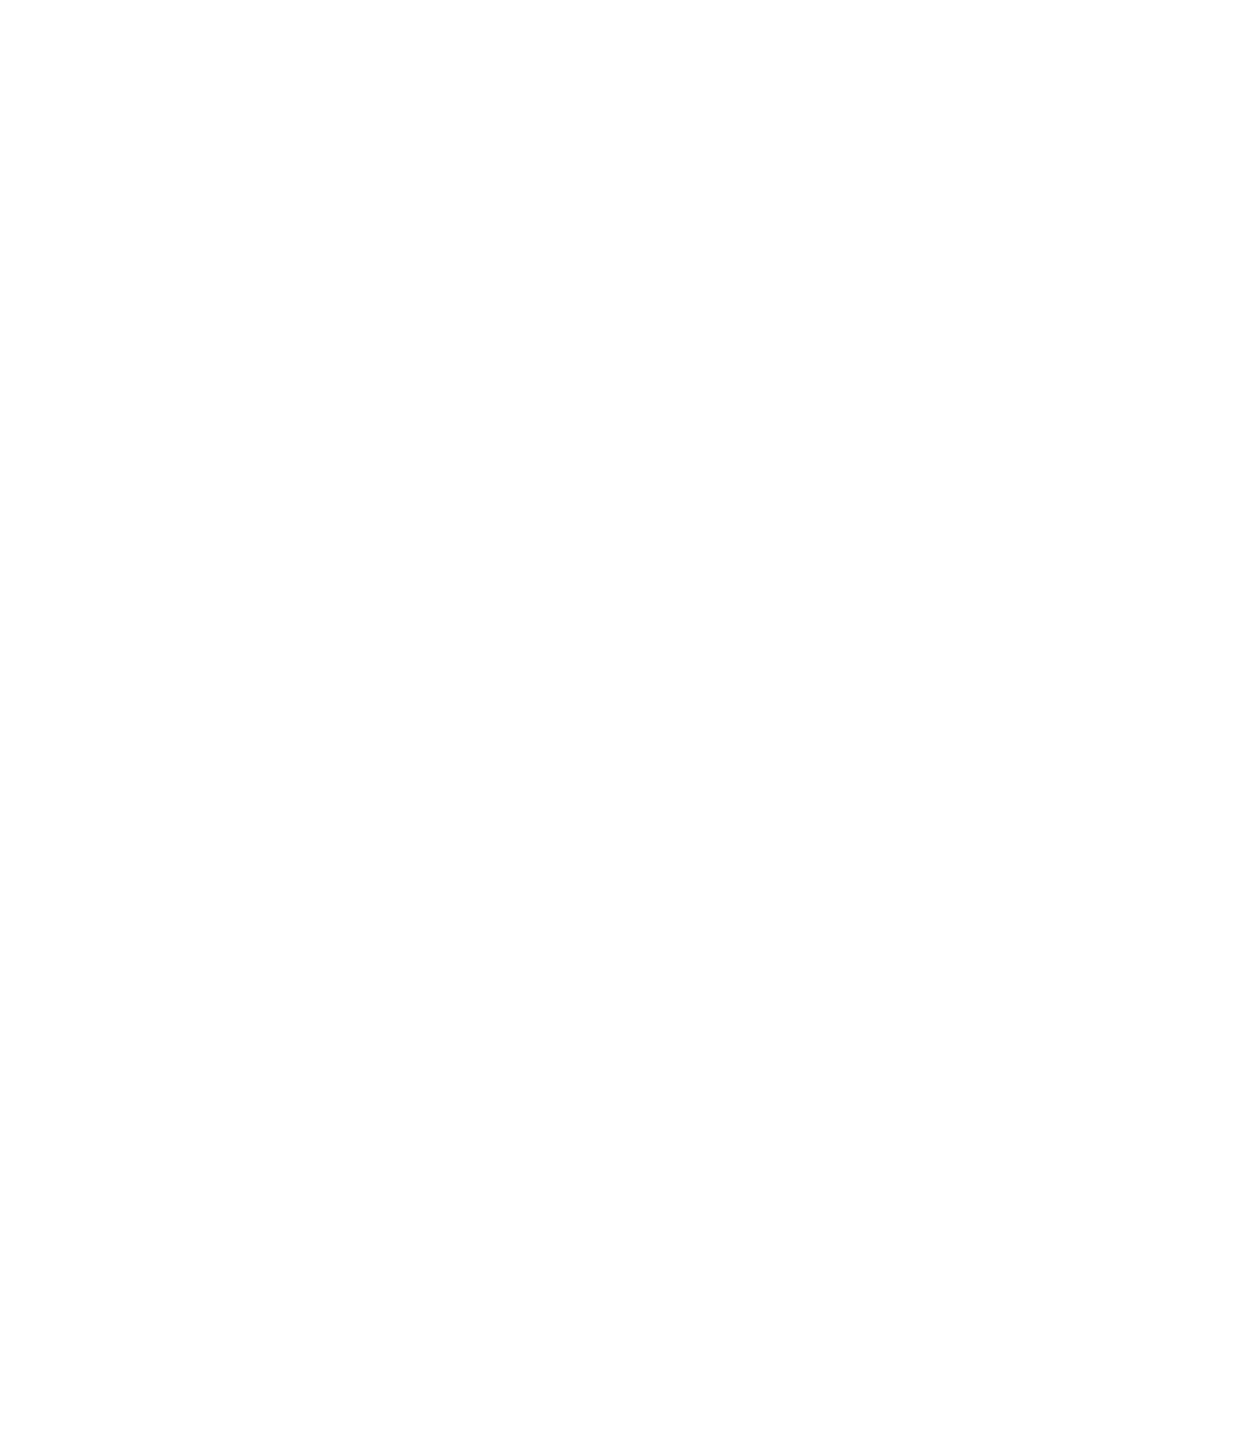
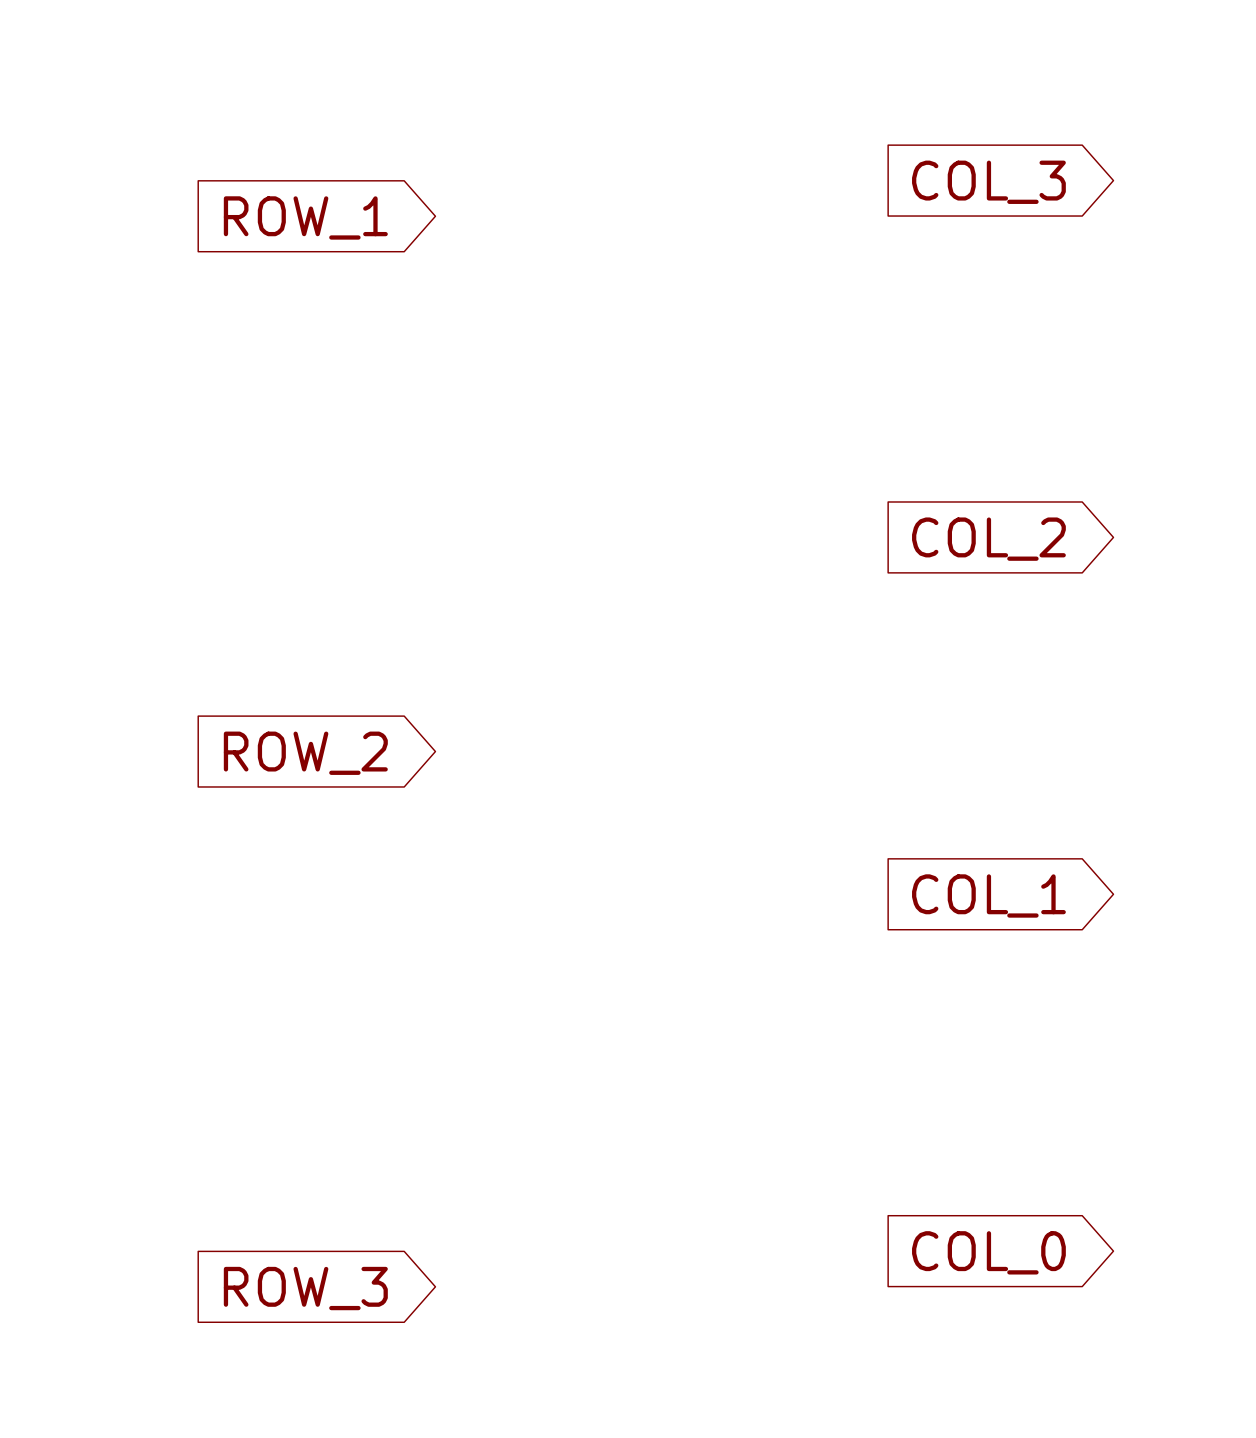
global label: none -> COL_3 (988, 182)
global label: none -> ROW_1 (305, 217)
global label: none -> COL_2 (988, 539)
global label: none -> ROW_2 (305, 753)
global label: none -> COL_1 (988, 895)
global label: none -> COL_0 (988, 1252)
global label: none -> ROW_3 (305, 1288)

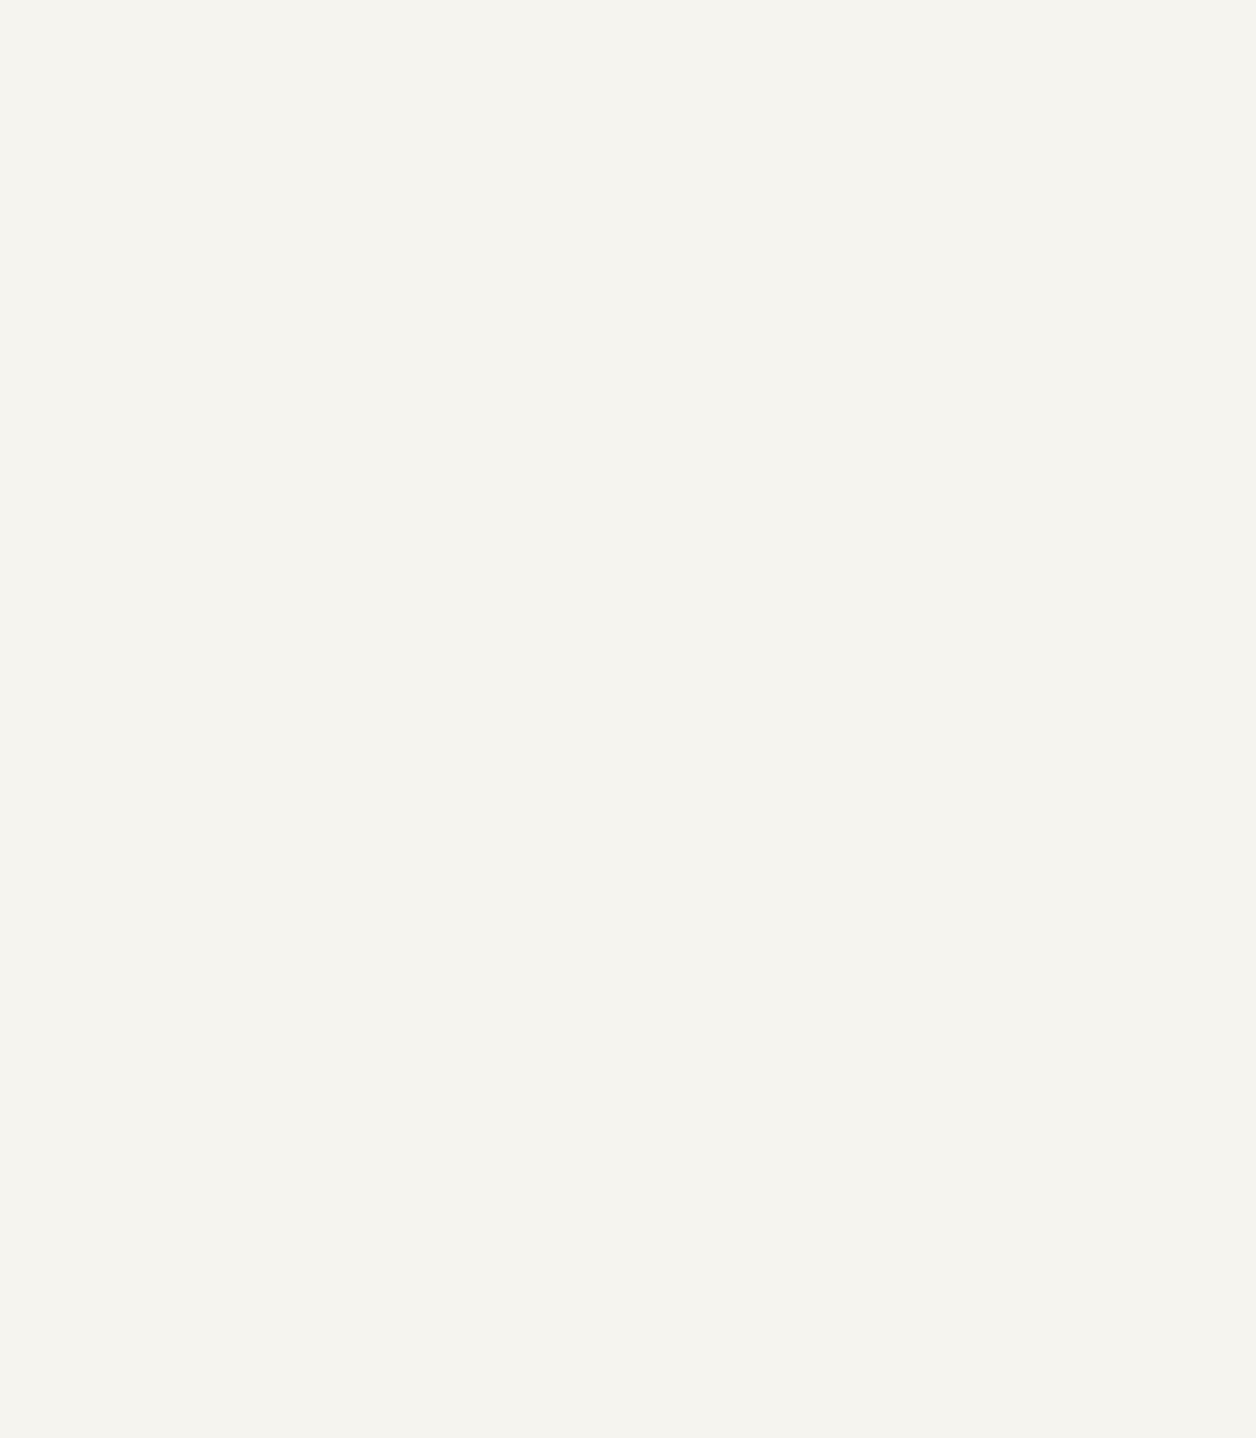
global label: COL_3 (988, 182) -> none
global label: ROW_1 (305, 217) -> none
global label: COL_2 (988, 539) -> none
global label: ROW_2 (305, 753) -> none
global label: COL_1 (988, 895) -> none
global label: COL_0 (988, 1252) -> none
global label: ROW_3 (305, 1288) -> none

